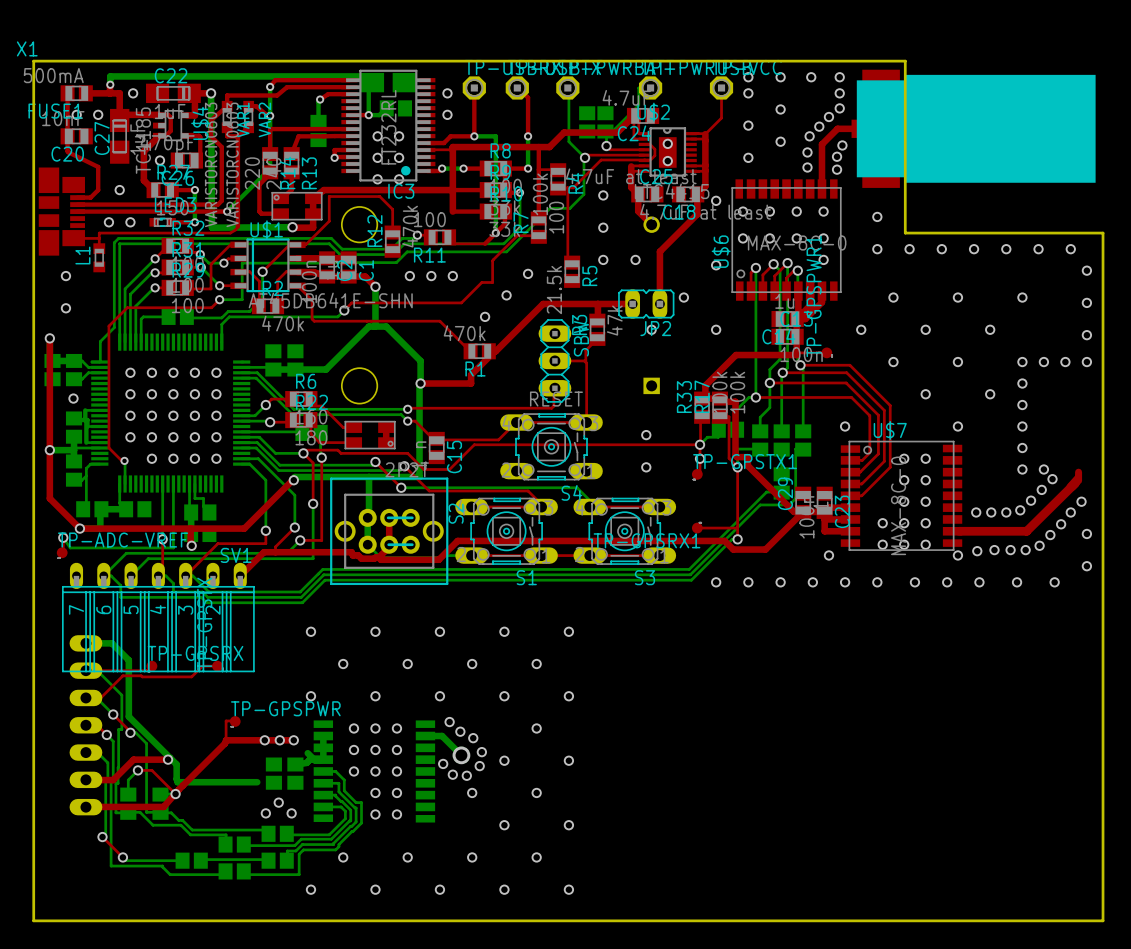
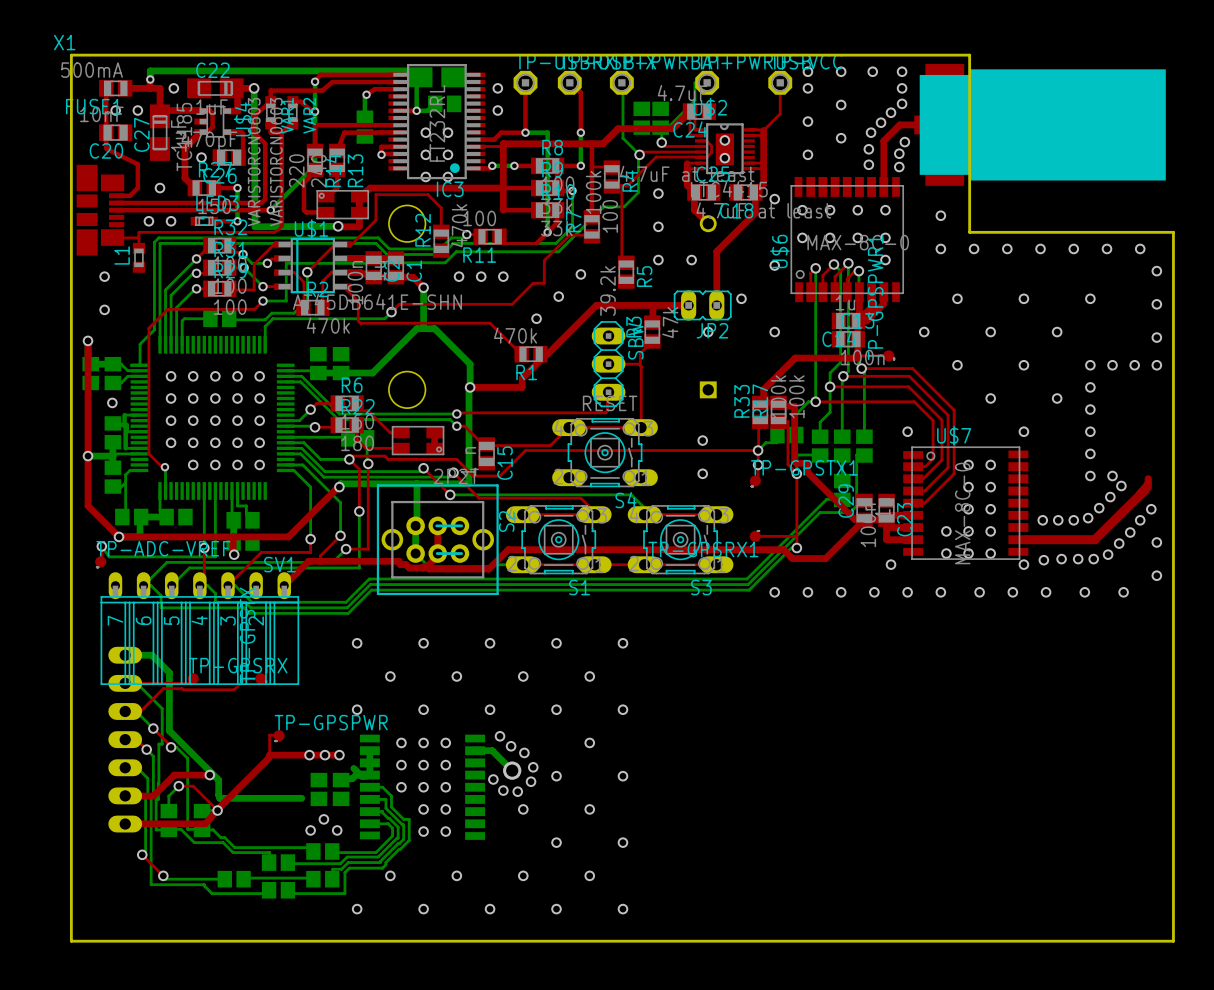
R5 value: 21.5k (554, 290) -> 39.2k (608, 291)

